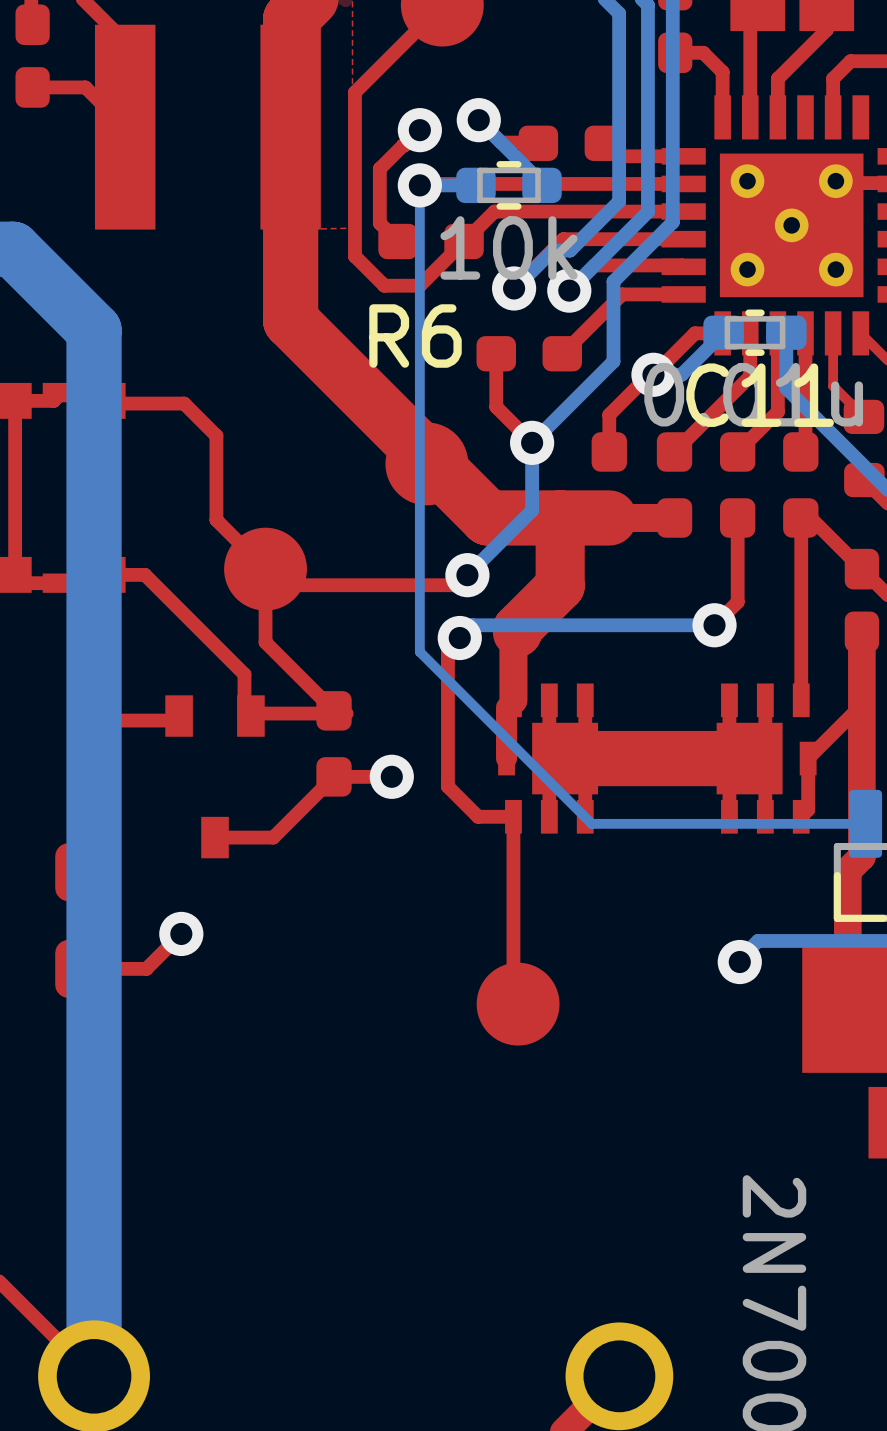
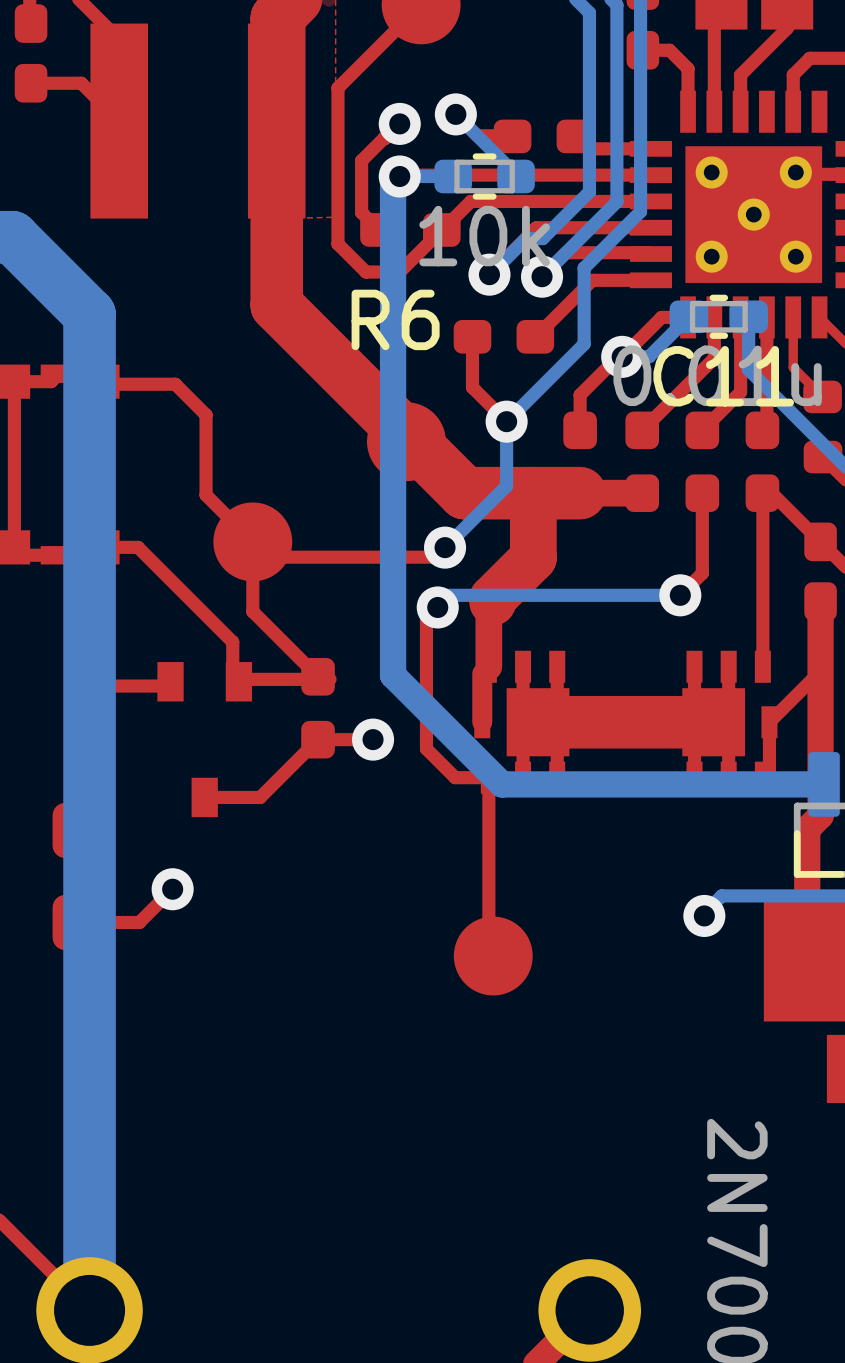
bottom track: (419, 185) (419, 651) (591, 823) -> (399, 176) (393, 183) (393, 675) (502, 784) (563, 784)
bottom track width: thin (865, 823) (591, 823) -> thick (824, 784) (563, 784)

